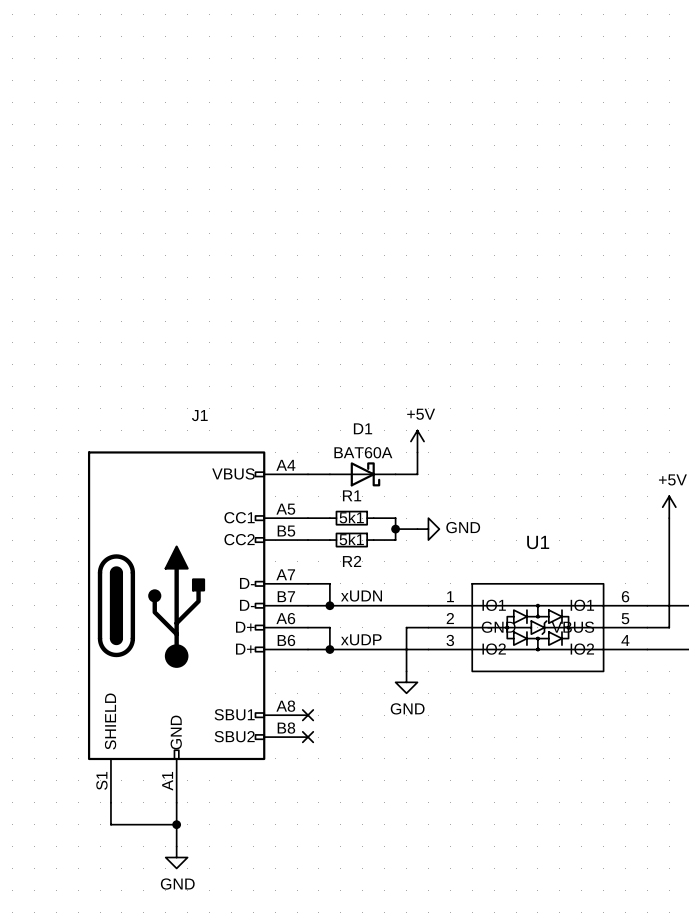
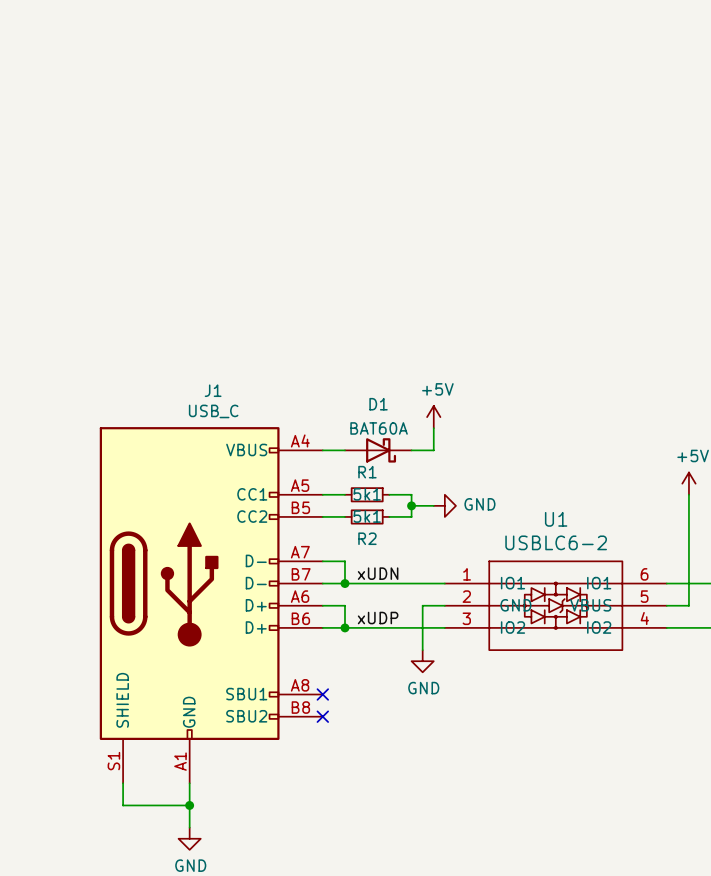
J1 value: none -> USB_C (213, 411)
U1 value: none -> USBLC6-2 (556, 542)

